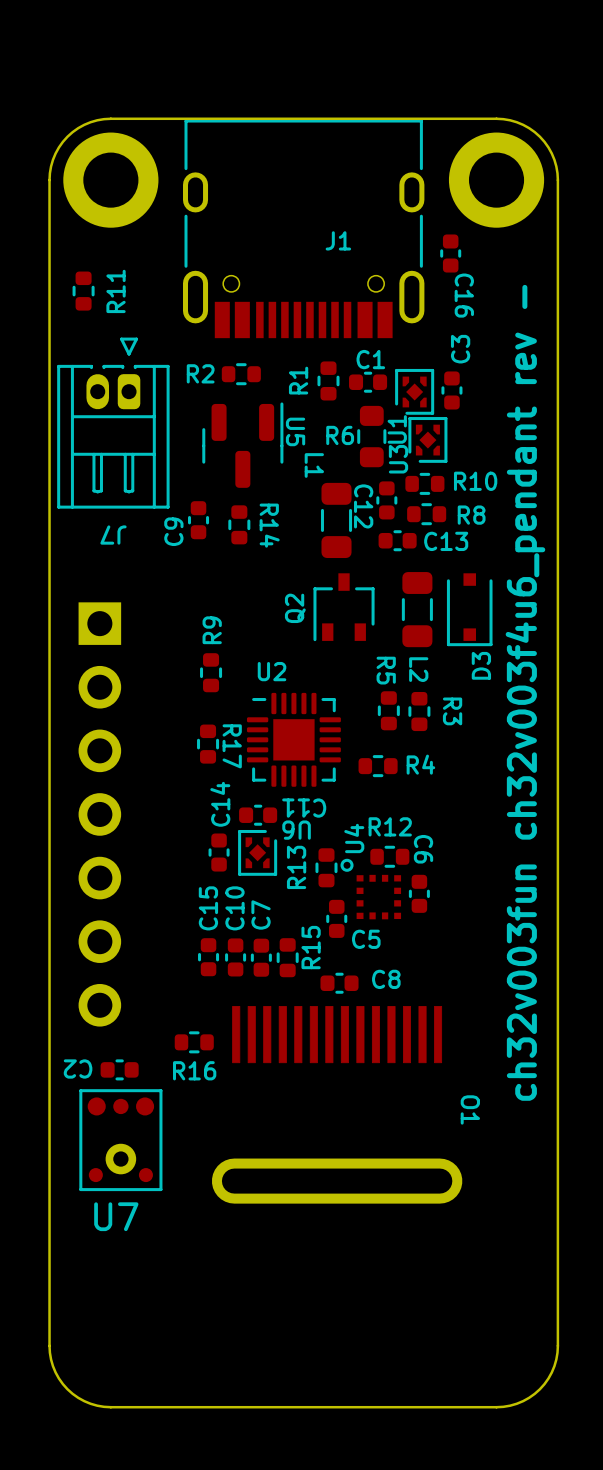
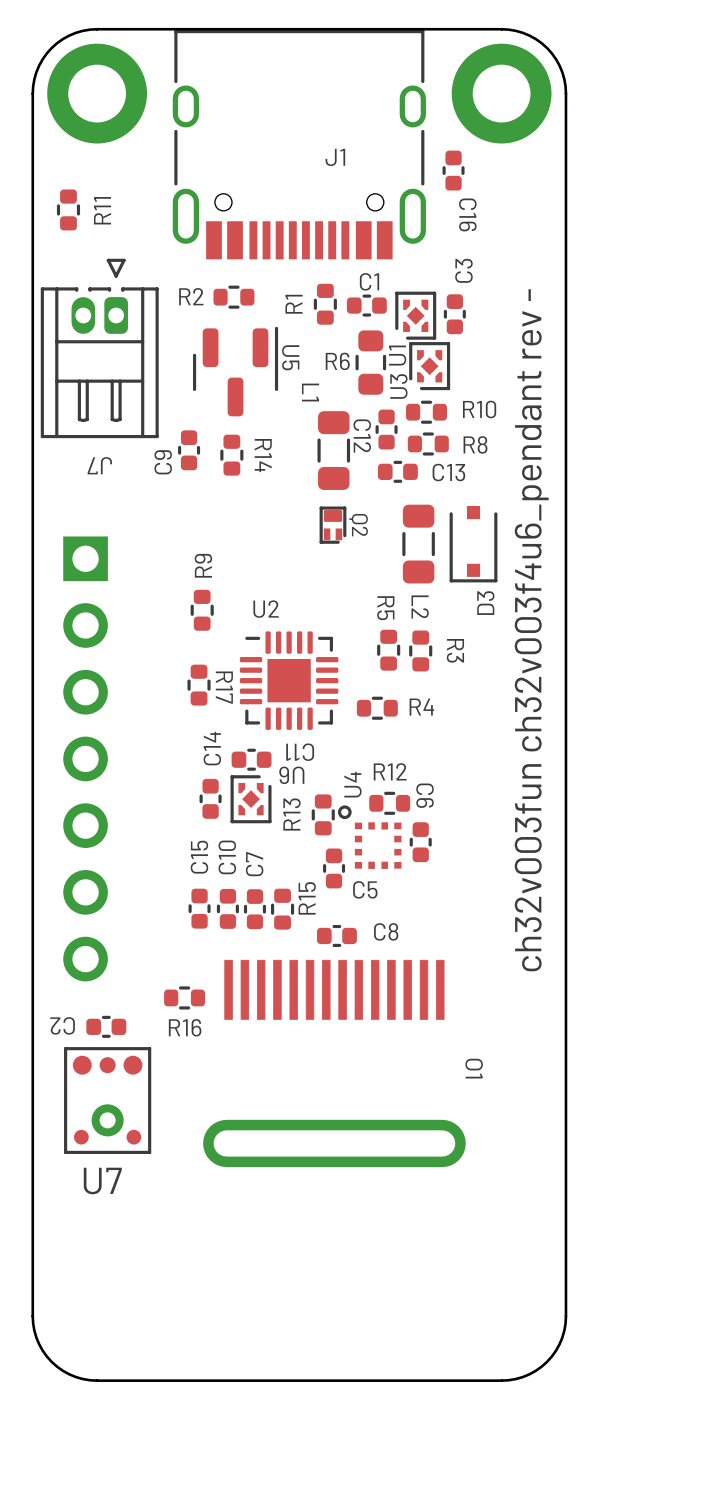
Q2 footprint: [313, 573, 375, 642] -> [319, 506, 347, 544]
Q2 name position: Q2 (295, 608) -> Q2 (358, 525)

